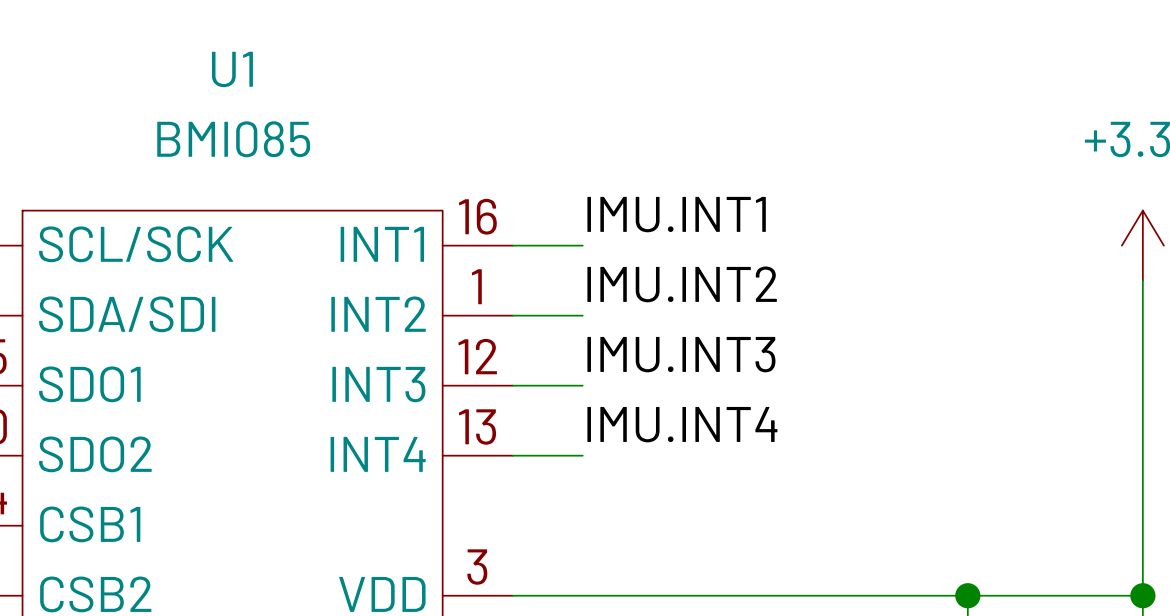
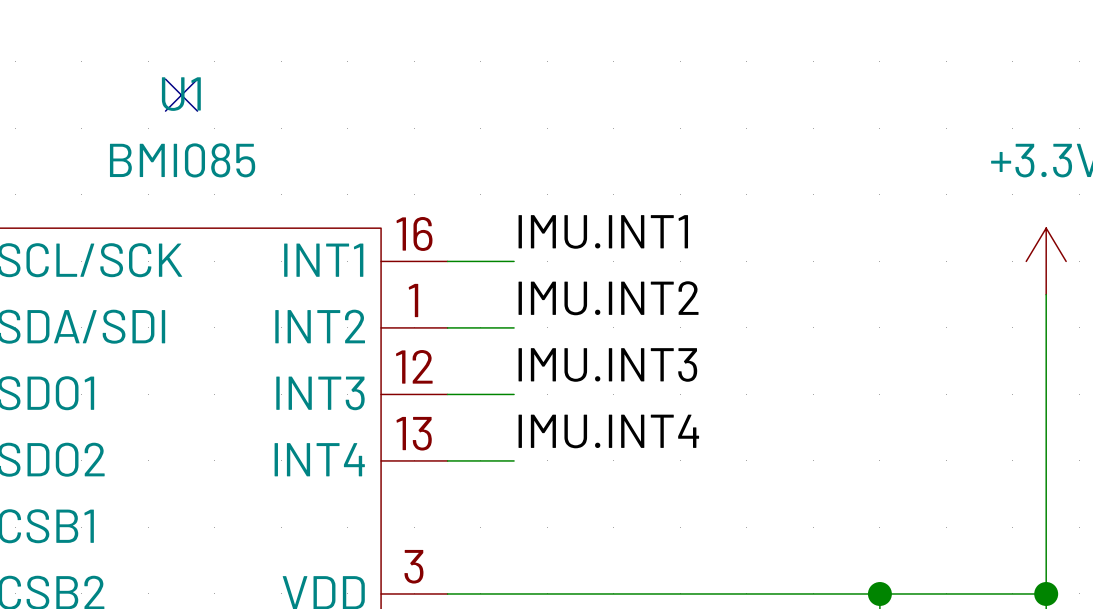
no-connect mark: none -> (181, 95)

